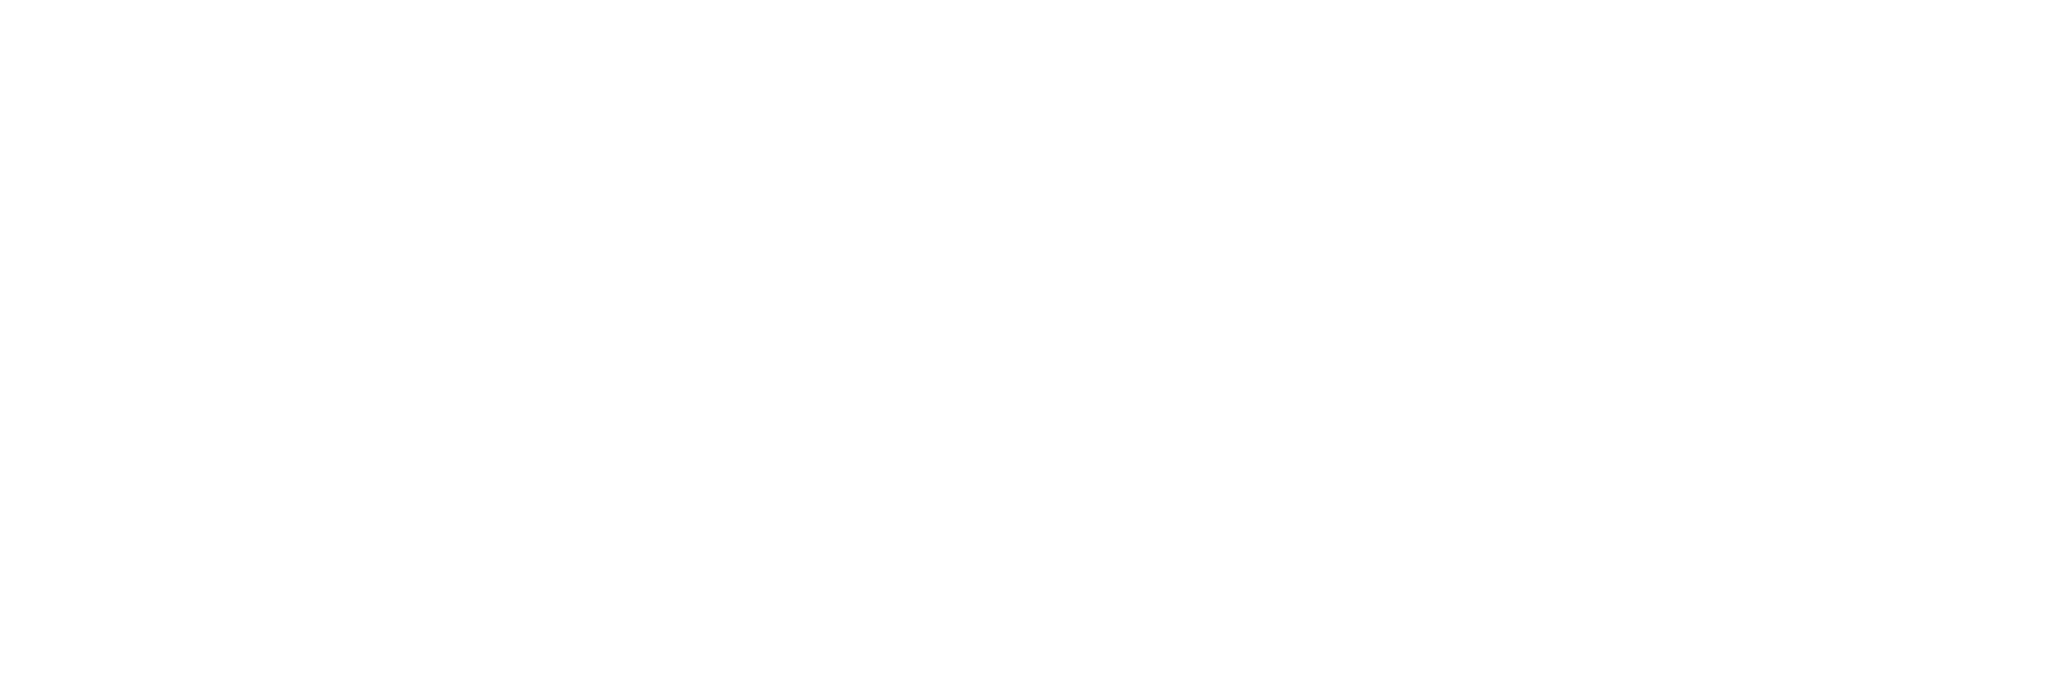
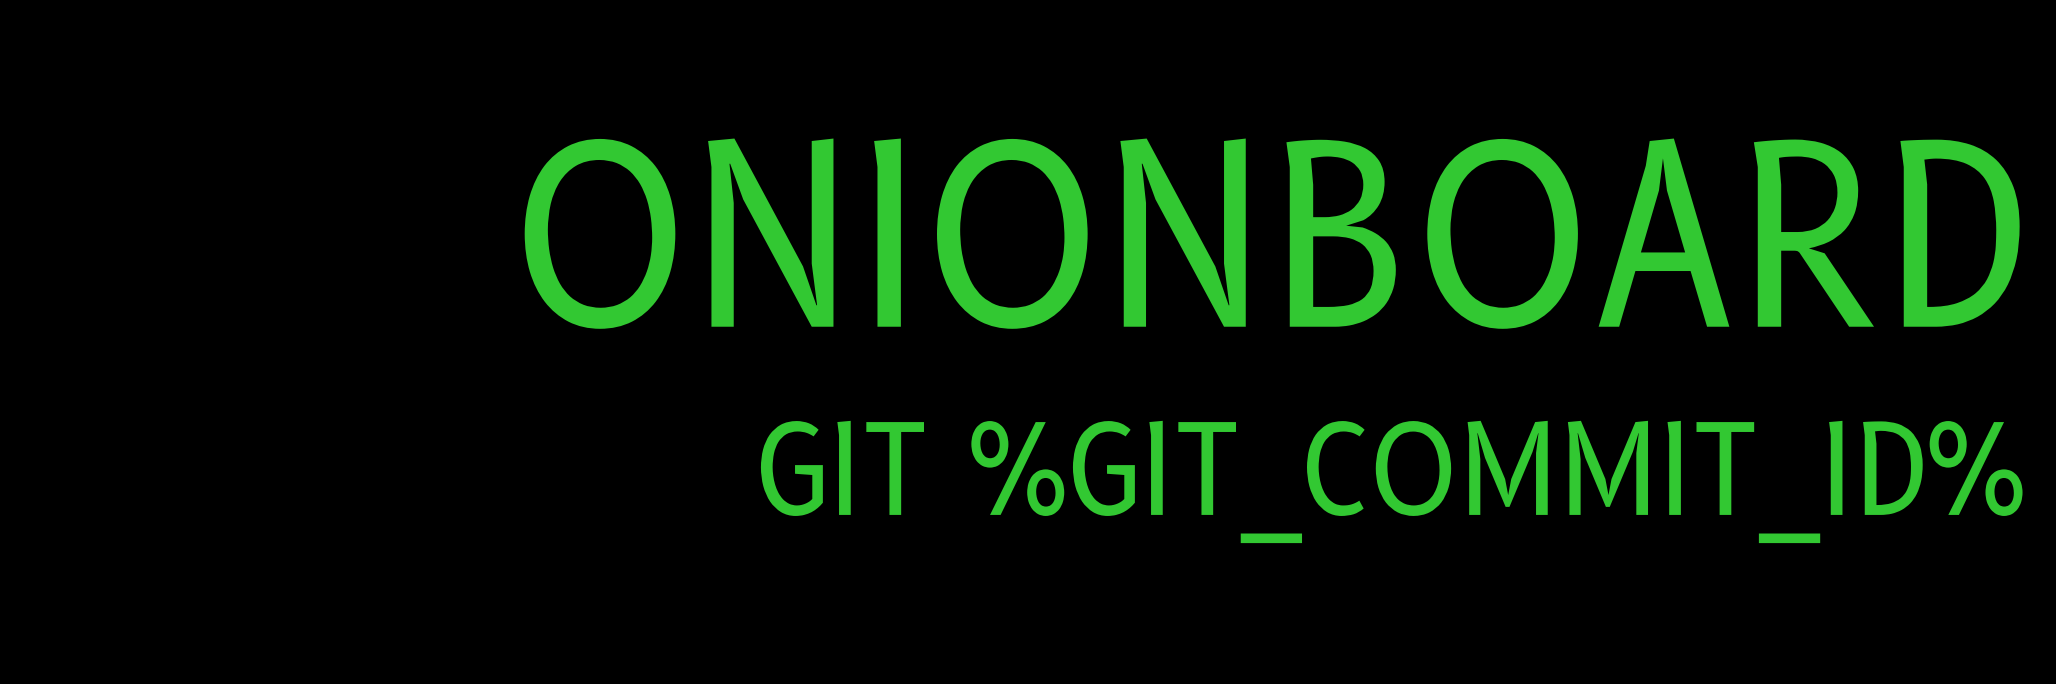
text: none -> ONIONBOARD (1272, 233)
text: none -> GIT %GIT_COMMIT_ID% (1391, 481)

